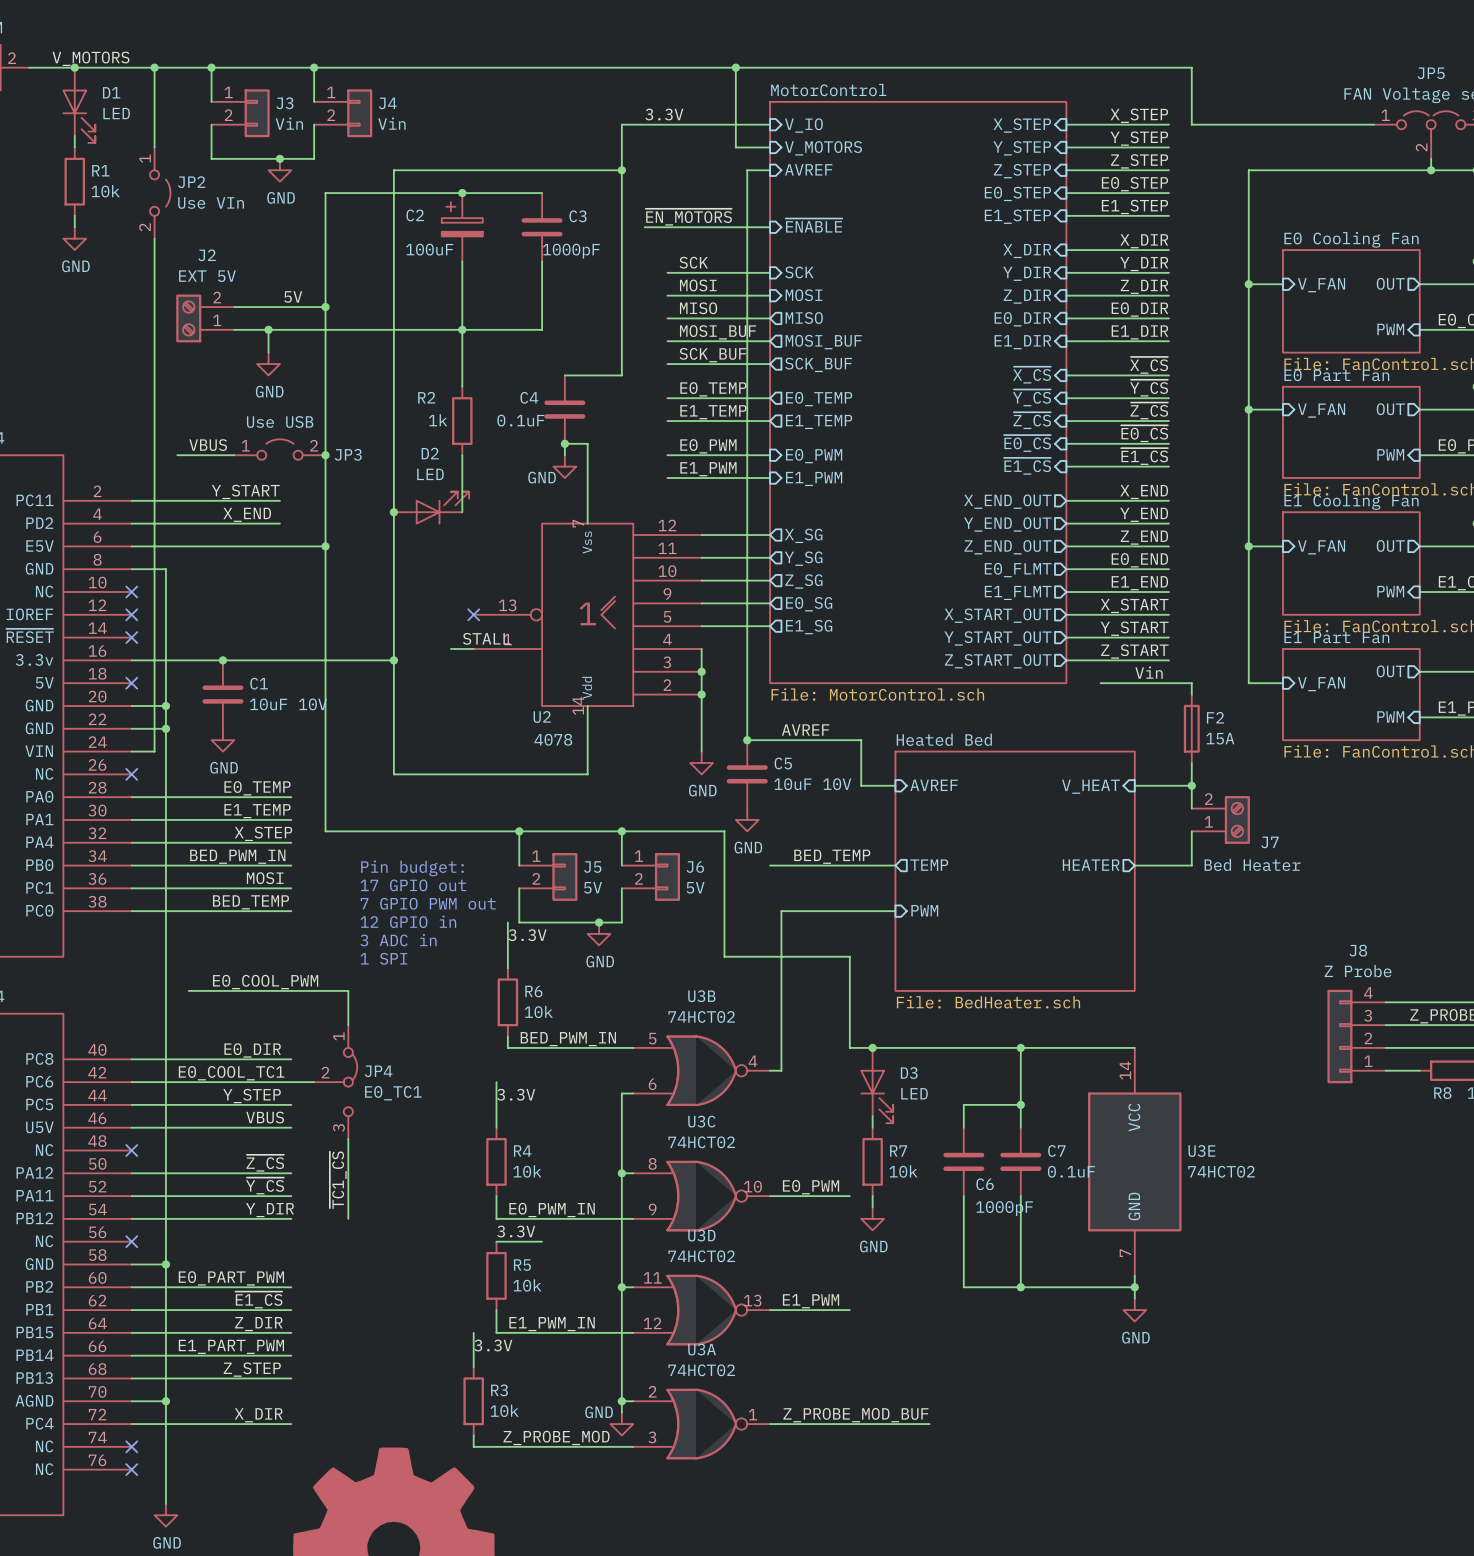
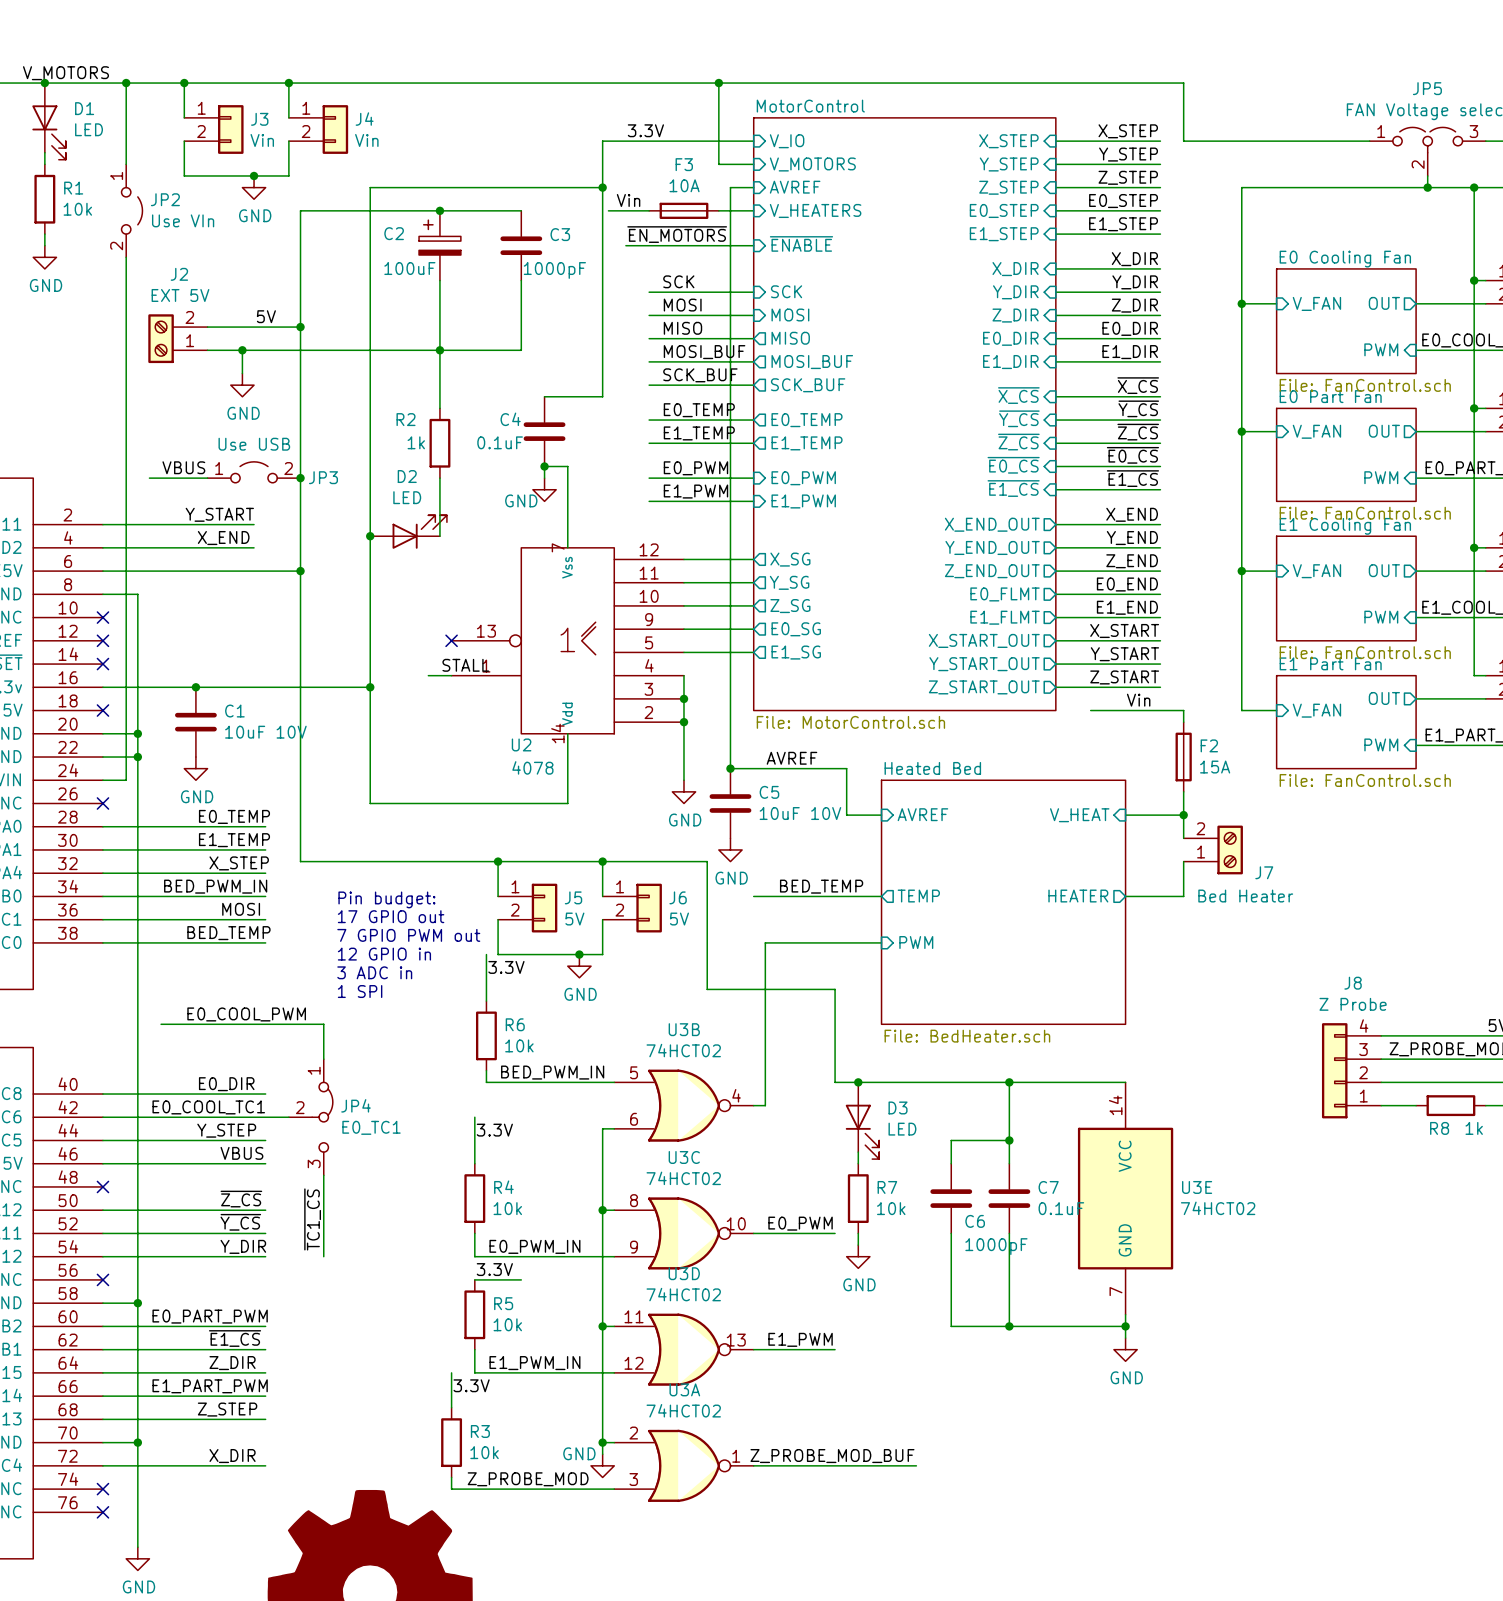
label: none -> Vin (628, 200)
wire: none -> (608, 210) (649, 210)
F3: none -> 10A (683, 210)
wire: none -> (718, 210) (753, 210)
sheet pin: none -> V_HEATERS (815, 210)

